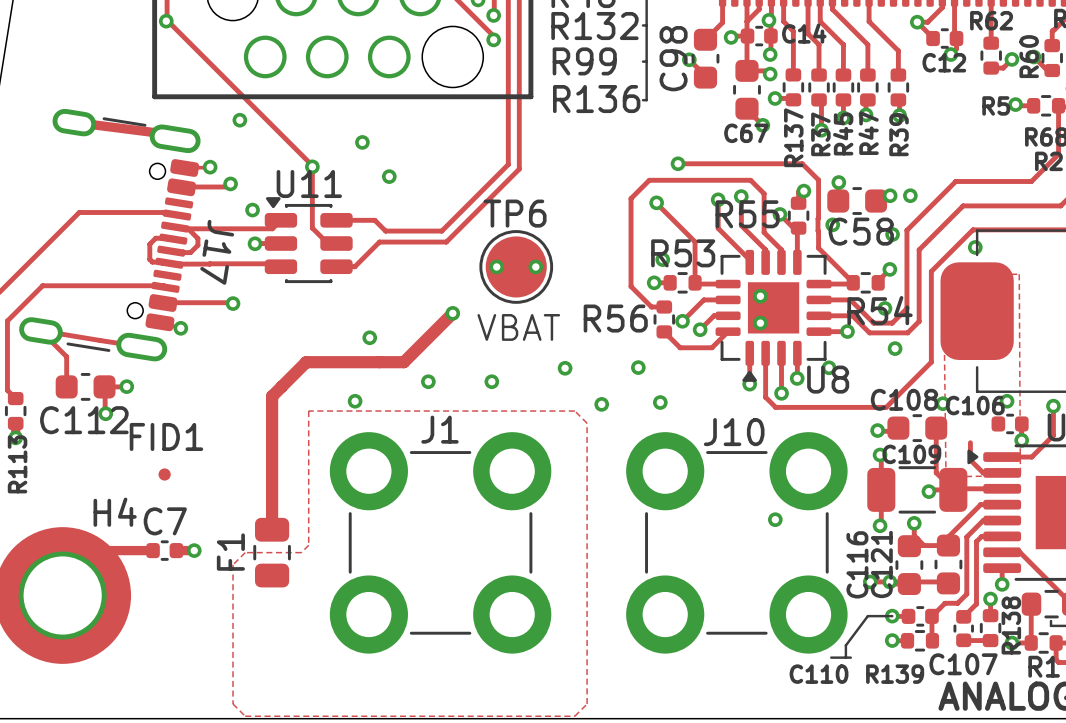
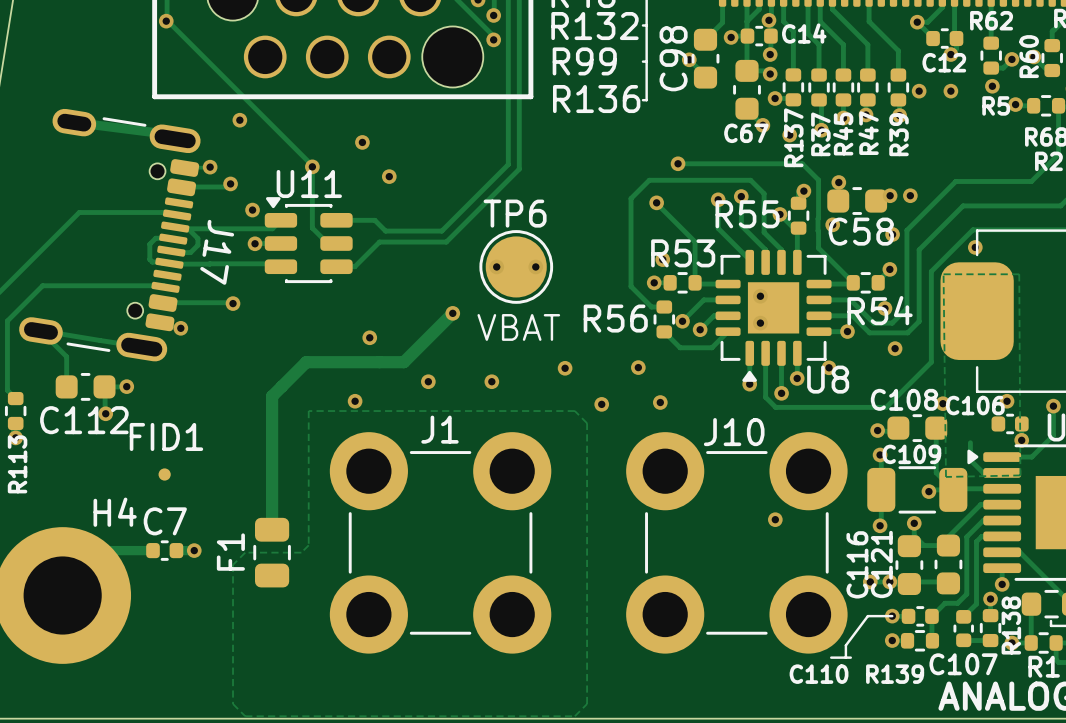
via: none -> (992, 86)
via: none -> (919, 91)
via: none -> (950, 91)
via: none -> (789, 135)

